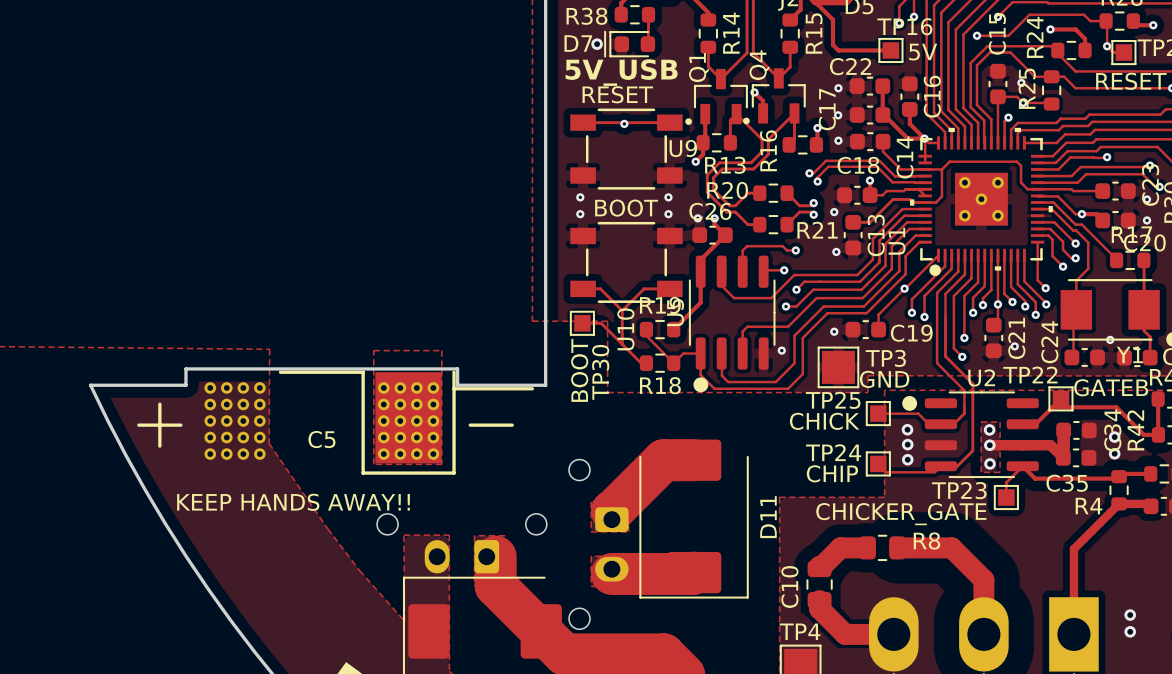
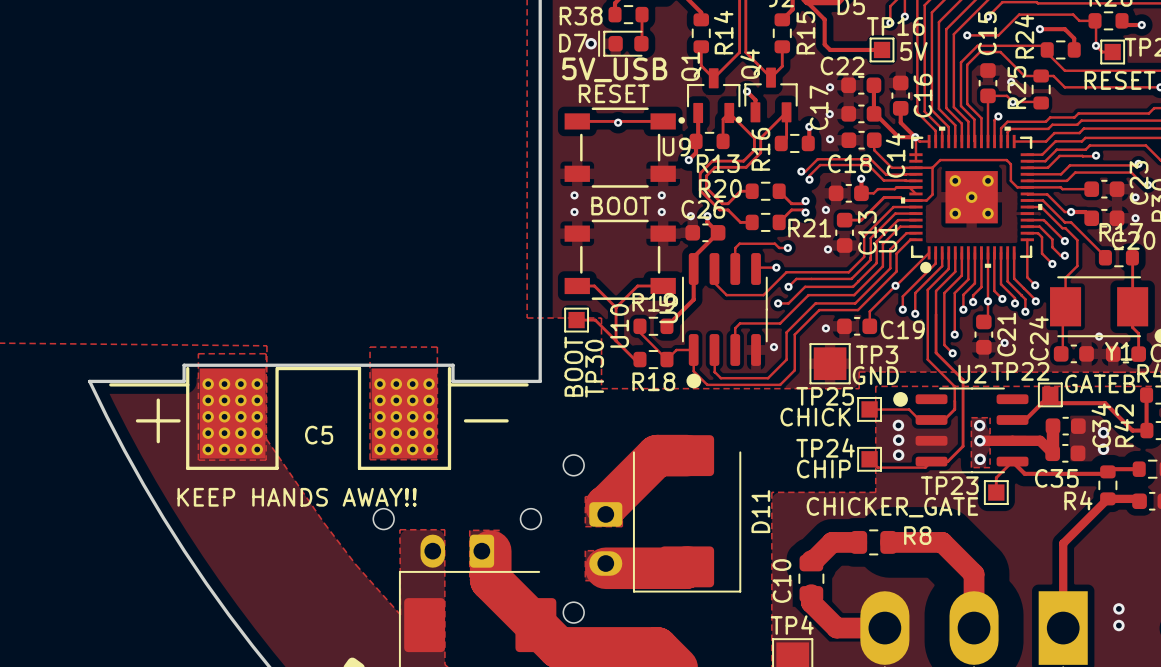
zone outline: none -> (198, 353) (198, 460) (266, 460) (266, 353) (198, 353)
C5 footprint: [137, 370, 535, 475] -> [109, 366, 529, 470]

